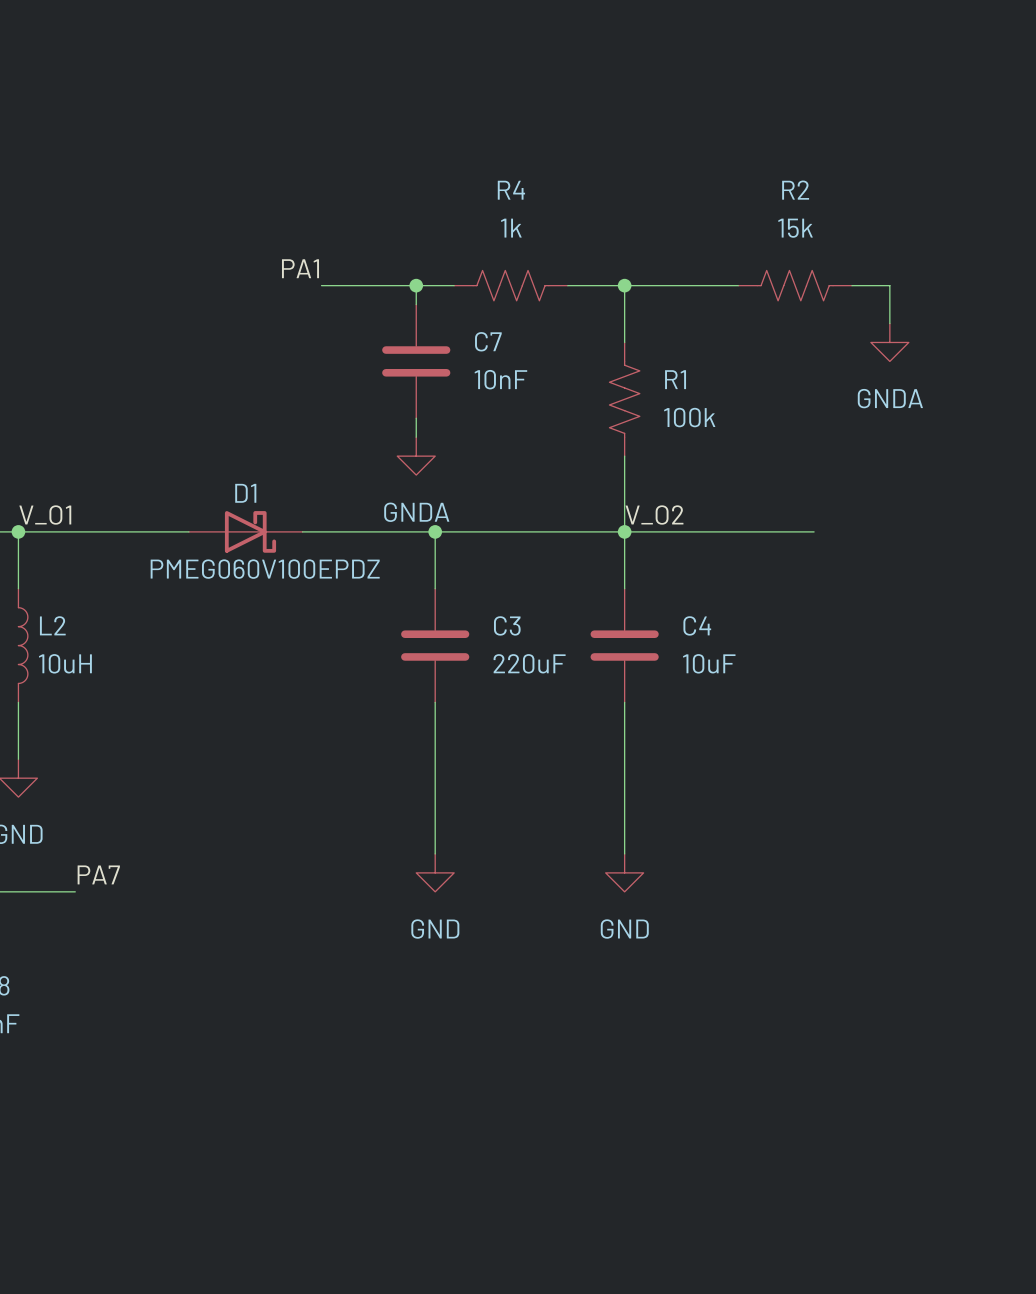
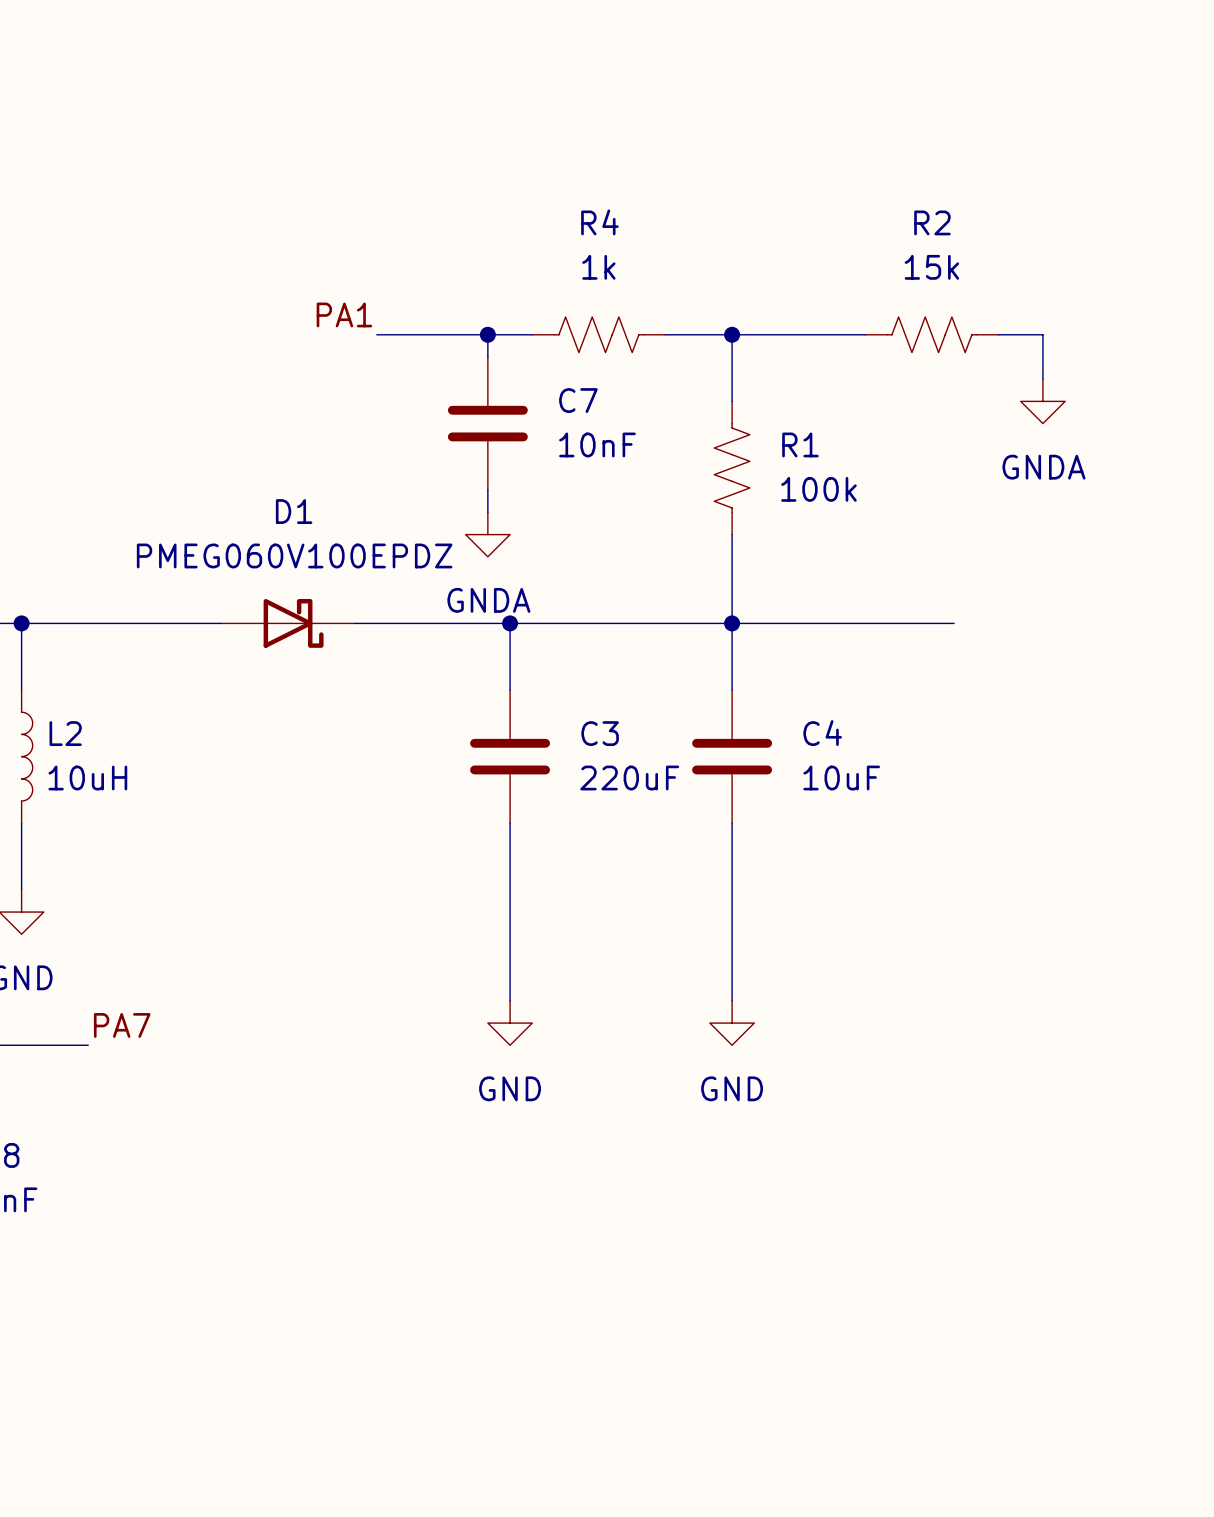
D1 name position: D1 (245, 493) -> D1 (294, 511)
label: V_O1 (45, 515) -> none
label: V_O2 (654, 515) -> none
D1 value position: PMEG060V100EPDZ (265, 569) -> PMEG060V100EPDZ (294, 555)

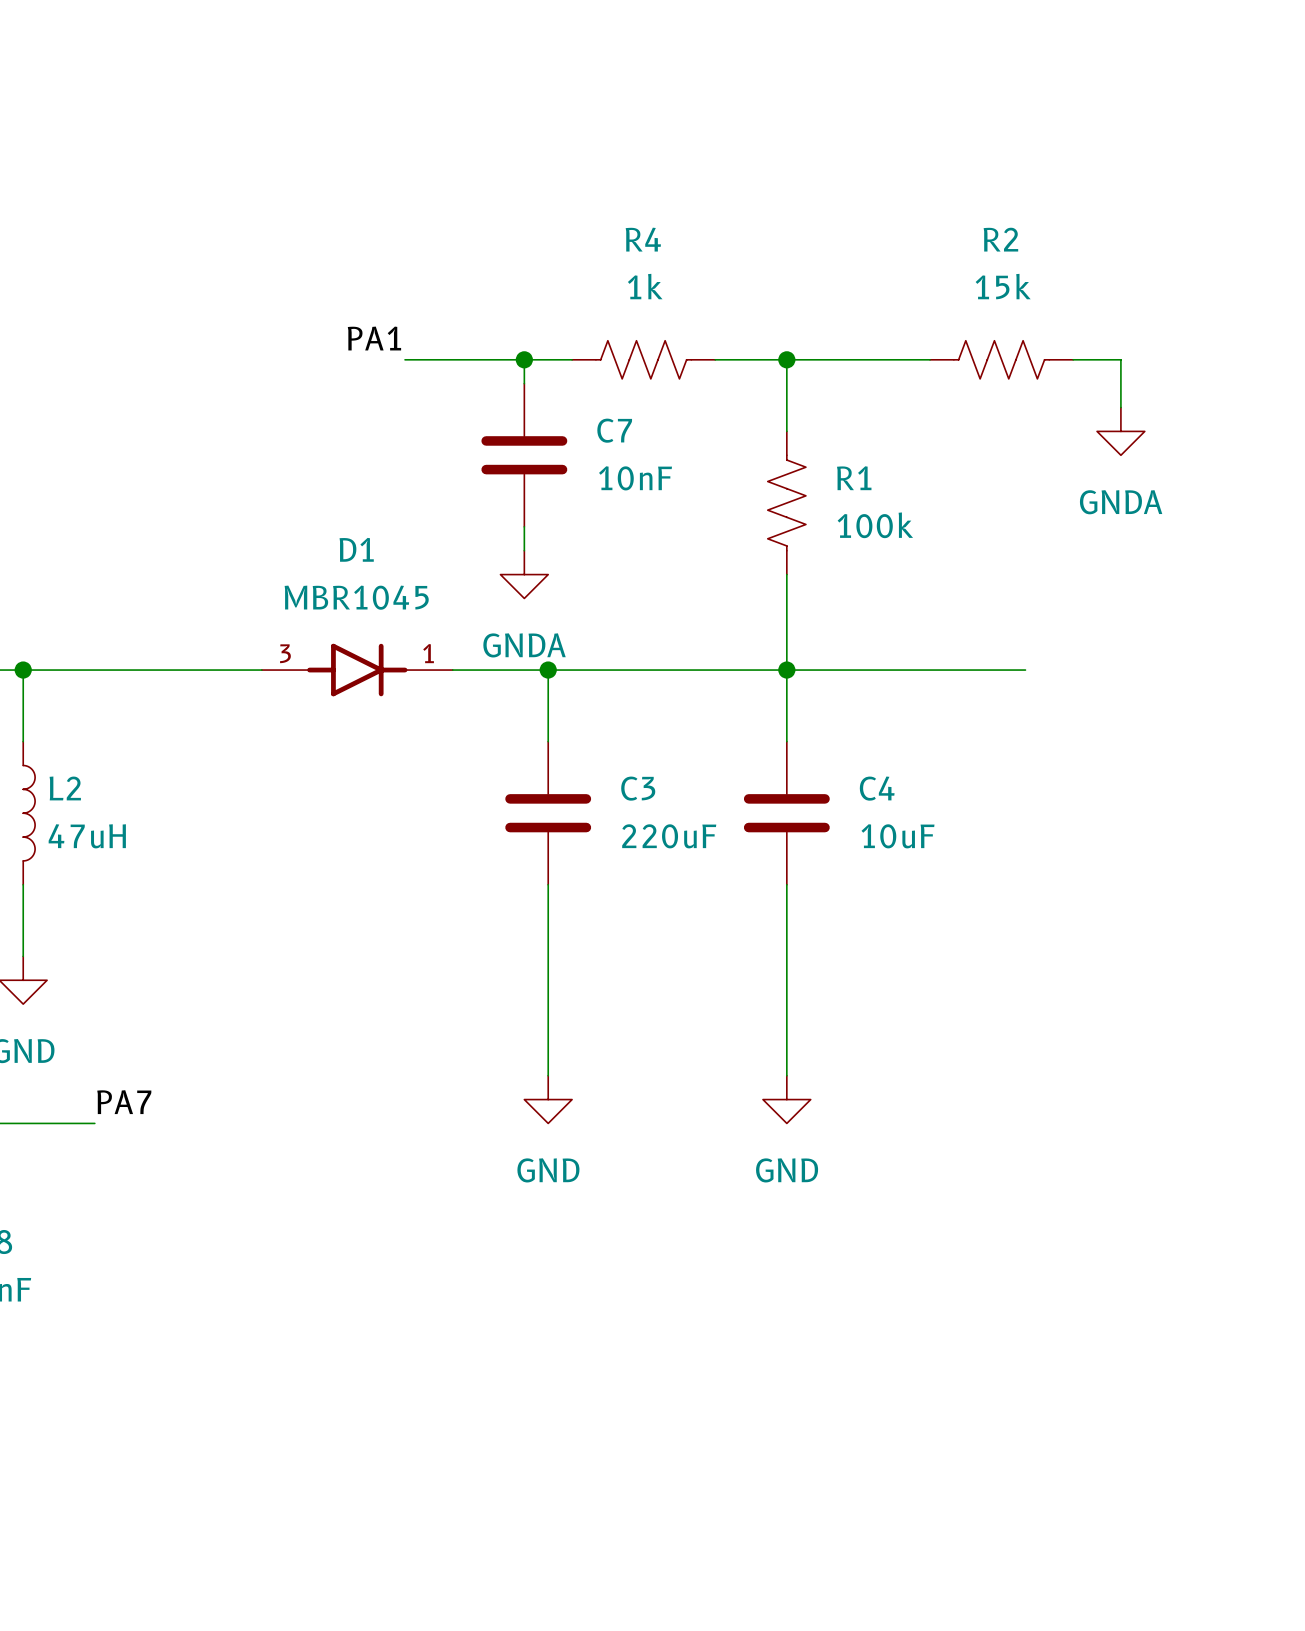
D1 value: PMEG060V100EPDZ (294, 555) -> MBR1045 (356, 597)
D1 symbol: [221, 598, 355, 648] -> [261, 643, 453, 697]
L2 value: 10uH (87, 778) -> 47uH (87, 836)

